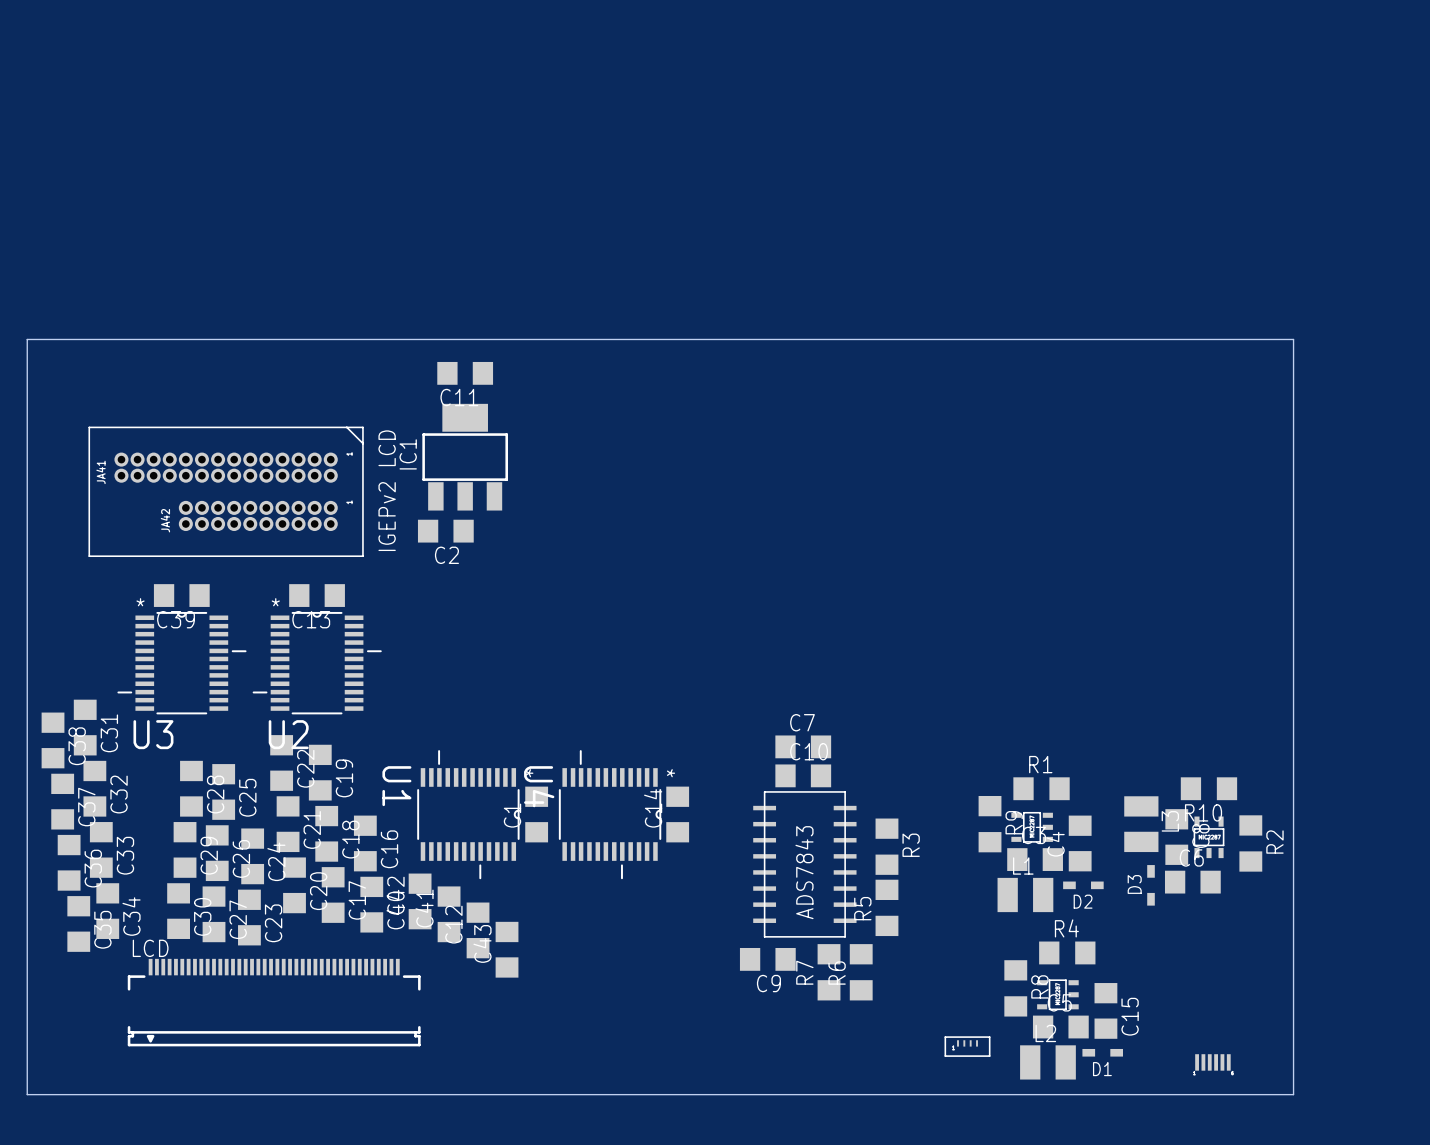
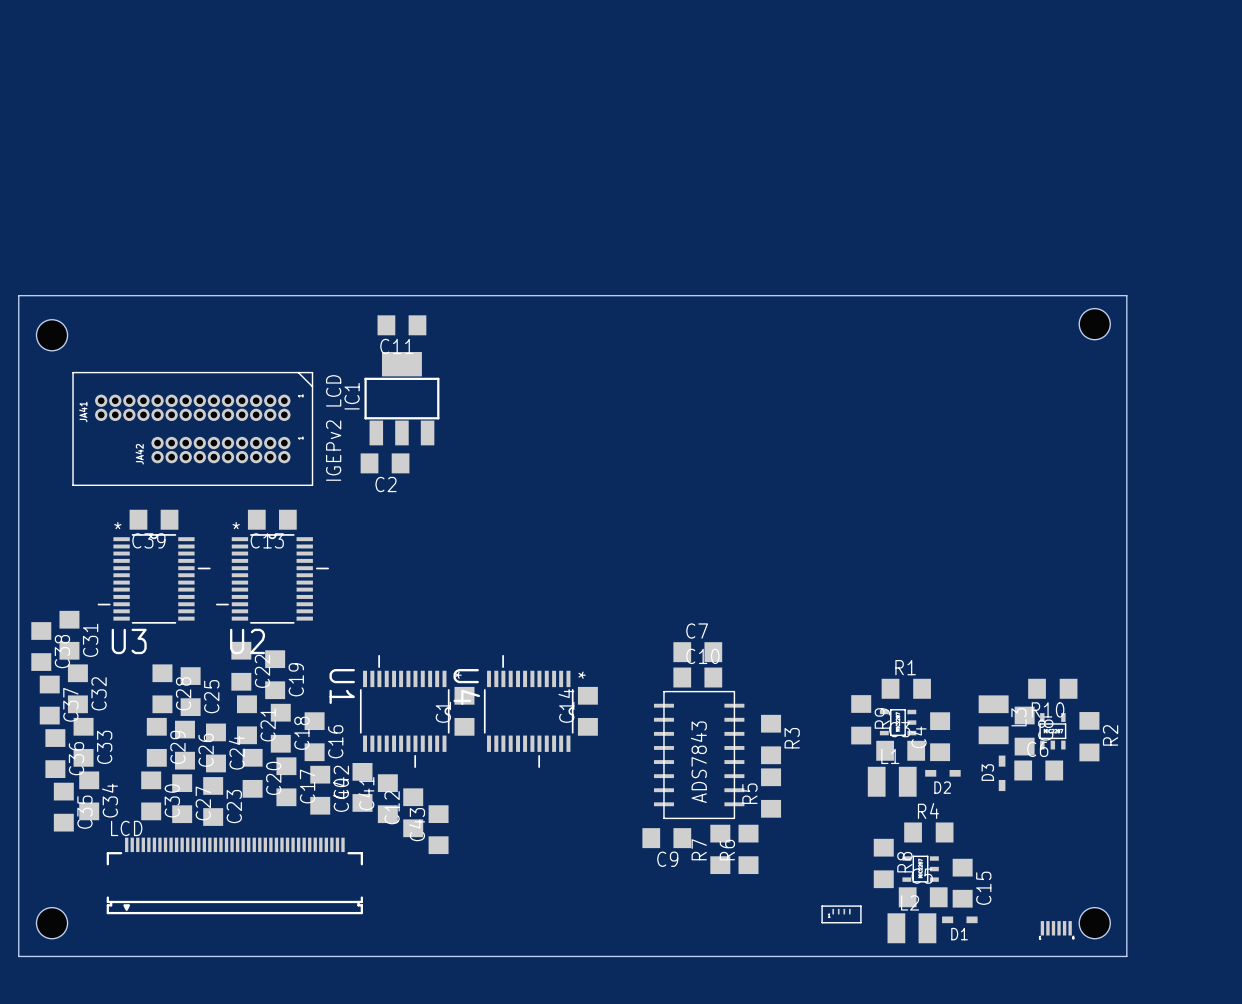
hole: none -> (1094, 324)
hole: none -> (52, 335)
hole: none -> (52, 923)
hole: none -> (1094, 923)

